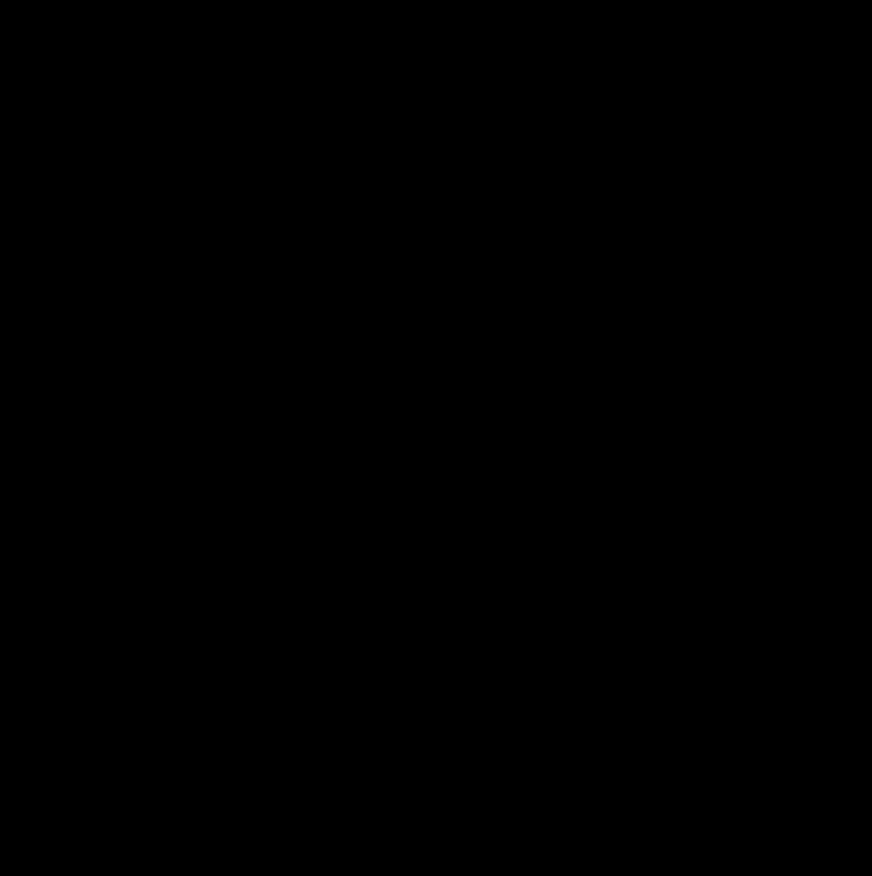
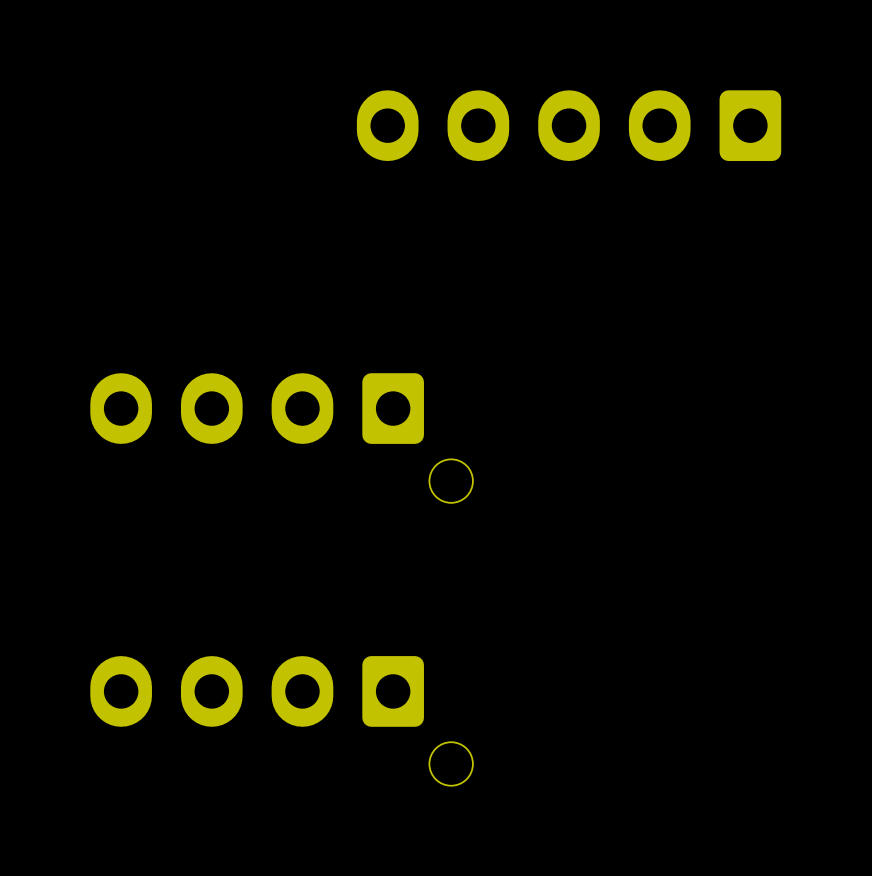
part: none -> (569, 125)
part: none -> (281, 438)
part: none -> (281, 720)

